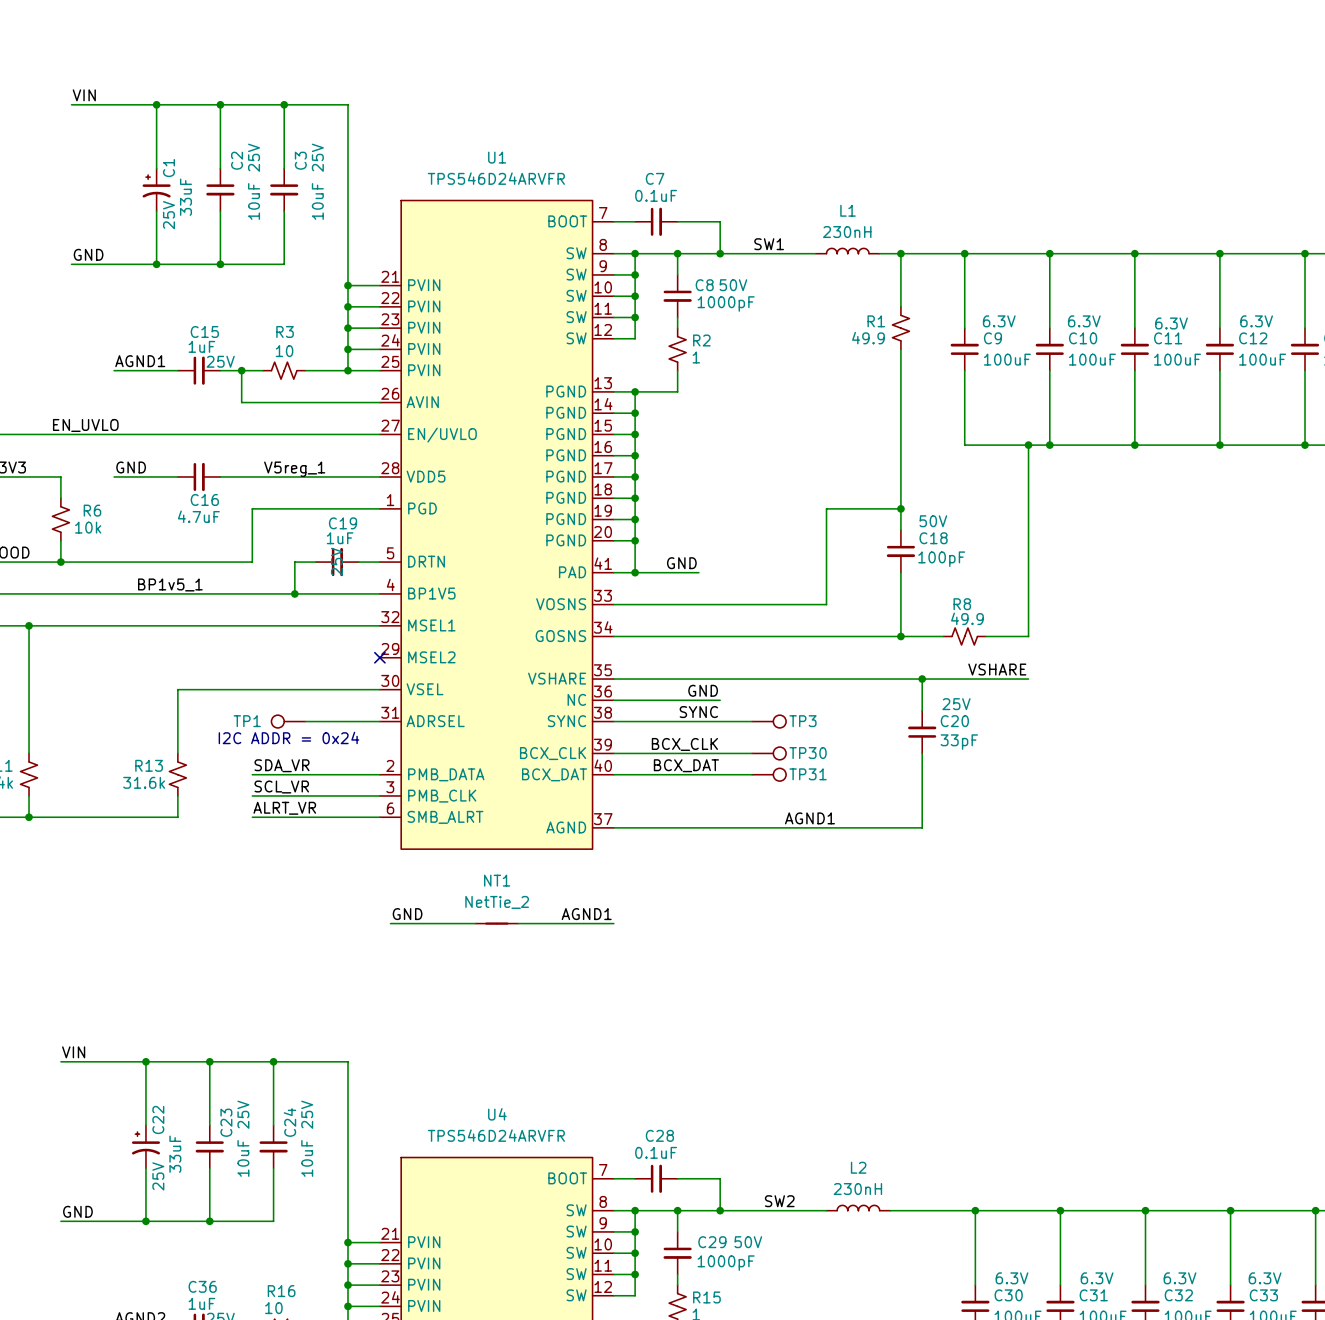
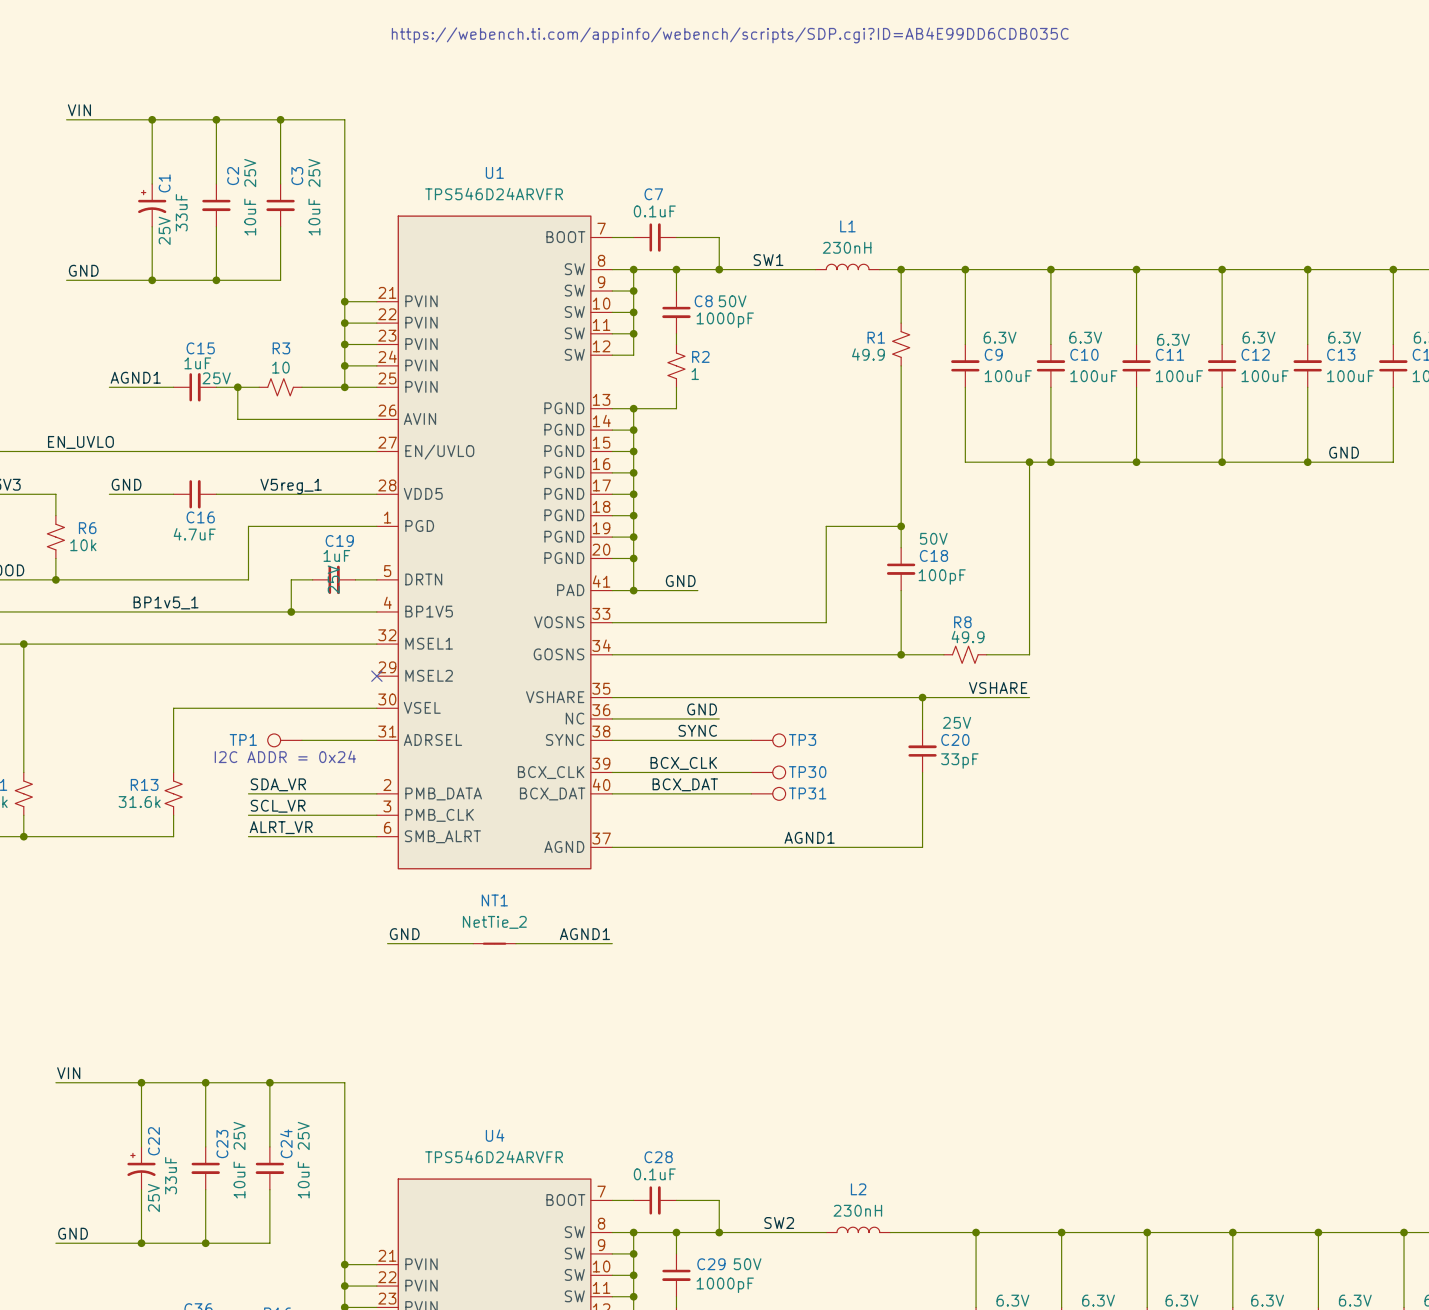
text: none -> https://webench.ti.com/appinfo/webench/scripts/SDP.cgi?ID=AB4E99DD6CDB035C (730, 35)

